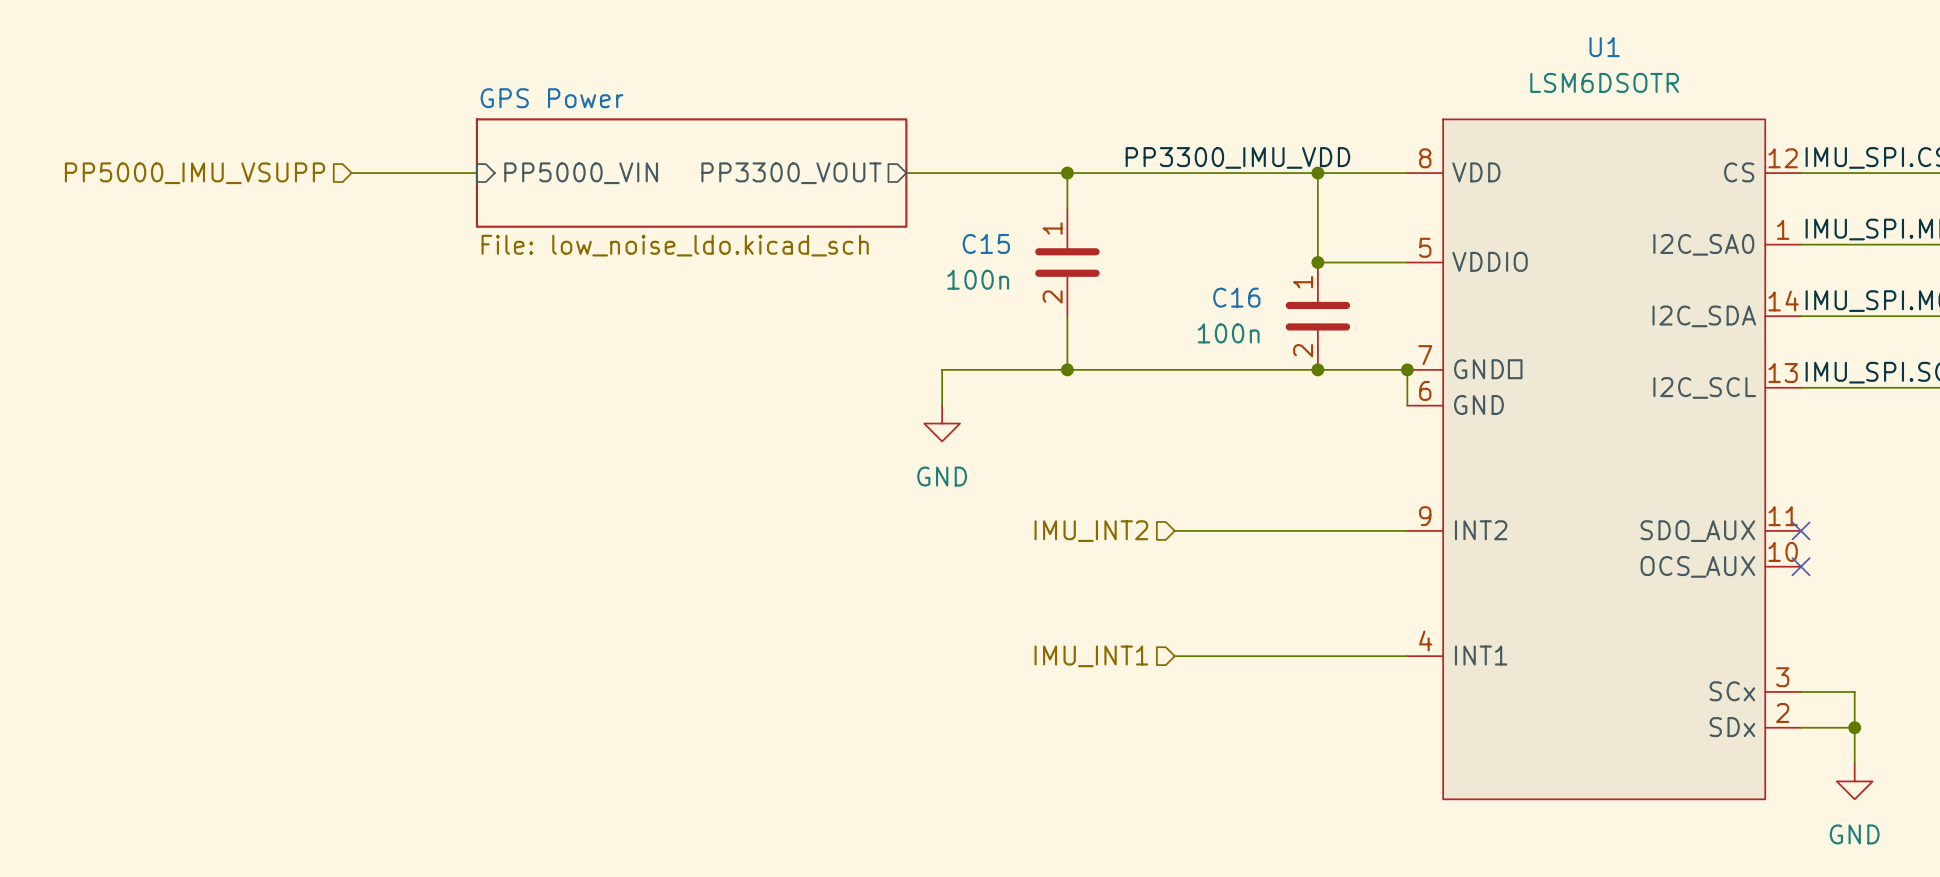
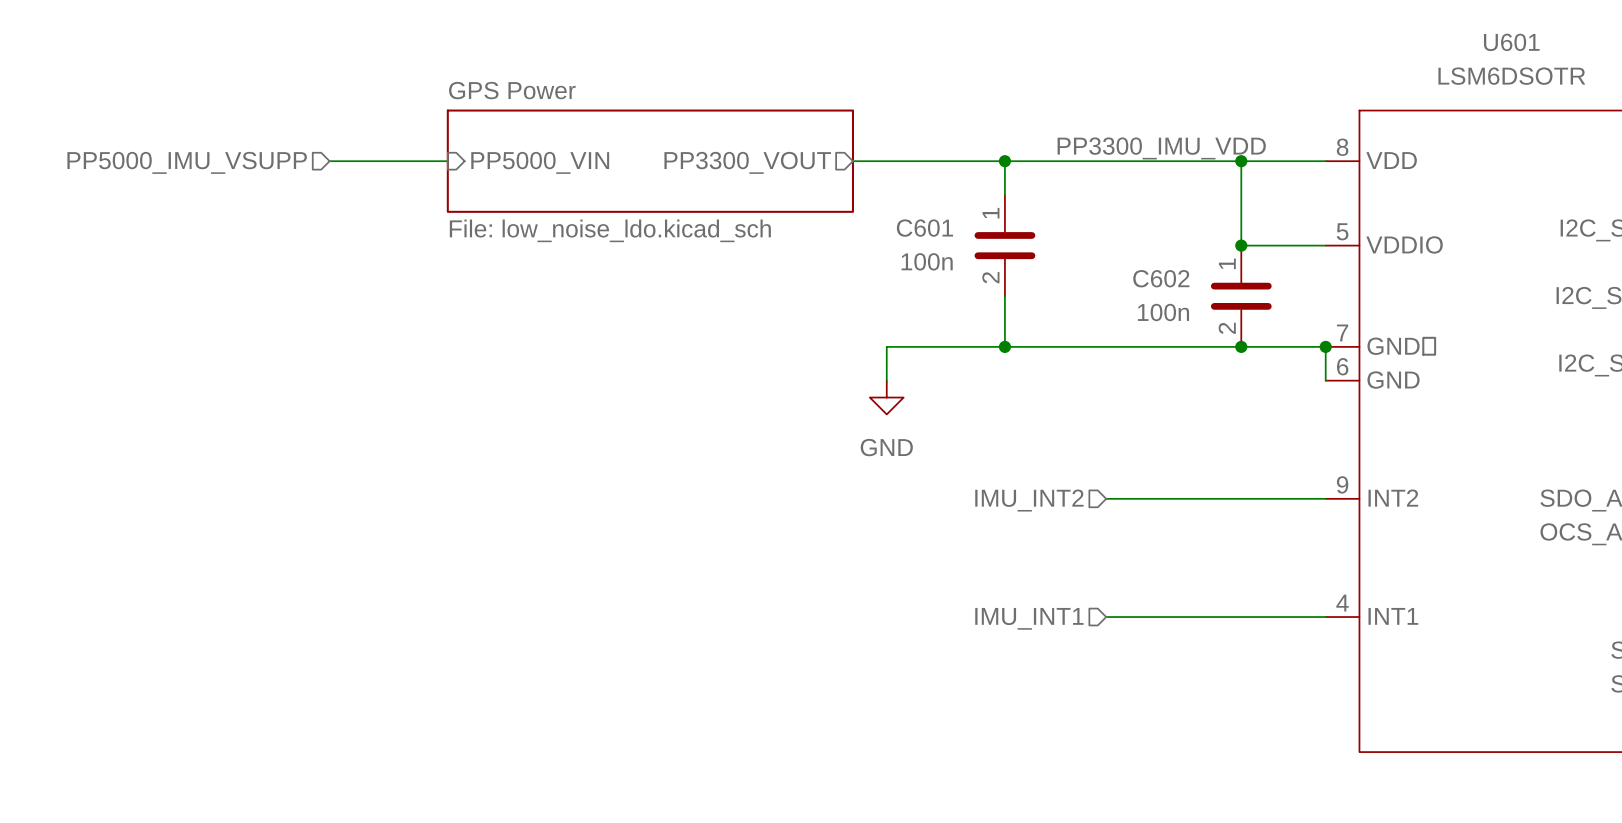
U1 name: U1 (1604, 47) -> U601 (1511, 42)
C15 name: C15 (986, 243) -> C601 (924, 228)
C16 name: C16 (1236, 297) -> C602 (1161, 278)

